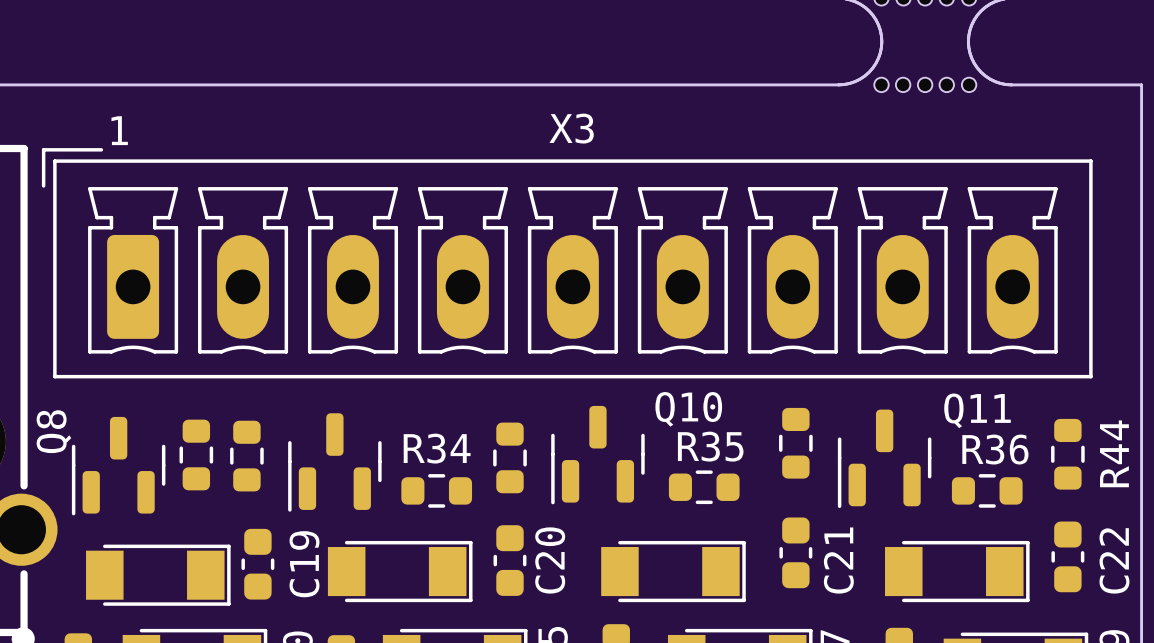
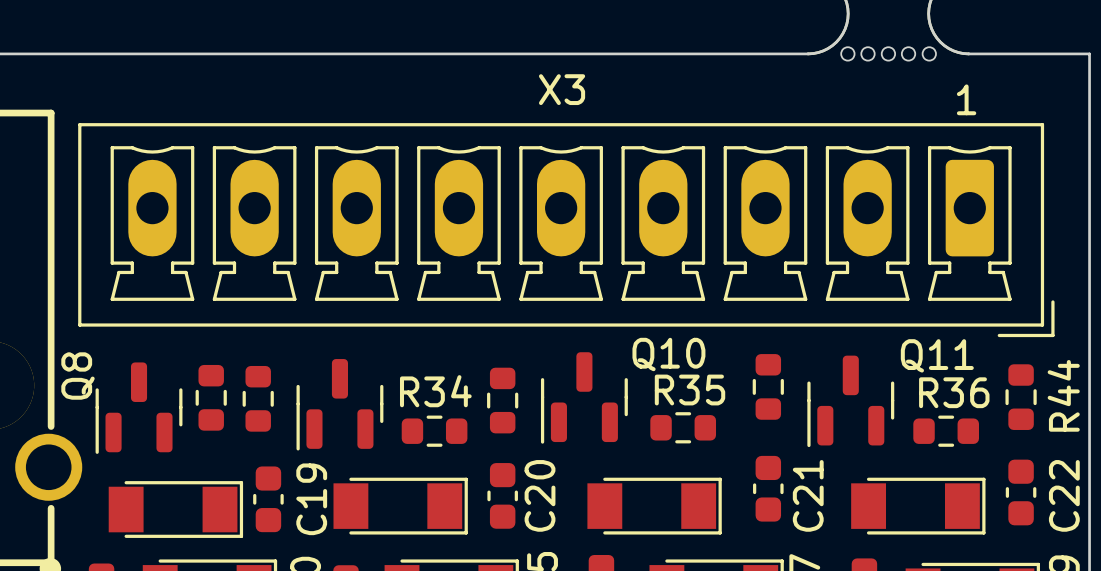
text: 1 (119, 130) -> none
text: none -> 1 (966, 99)
X3 rotation: 0° (567, 263) -> 180° (566, 230)

